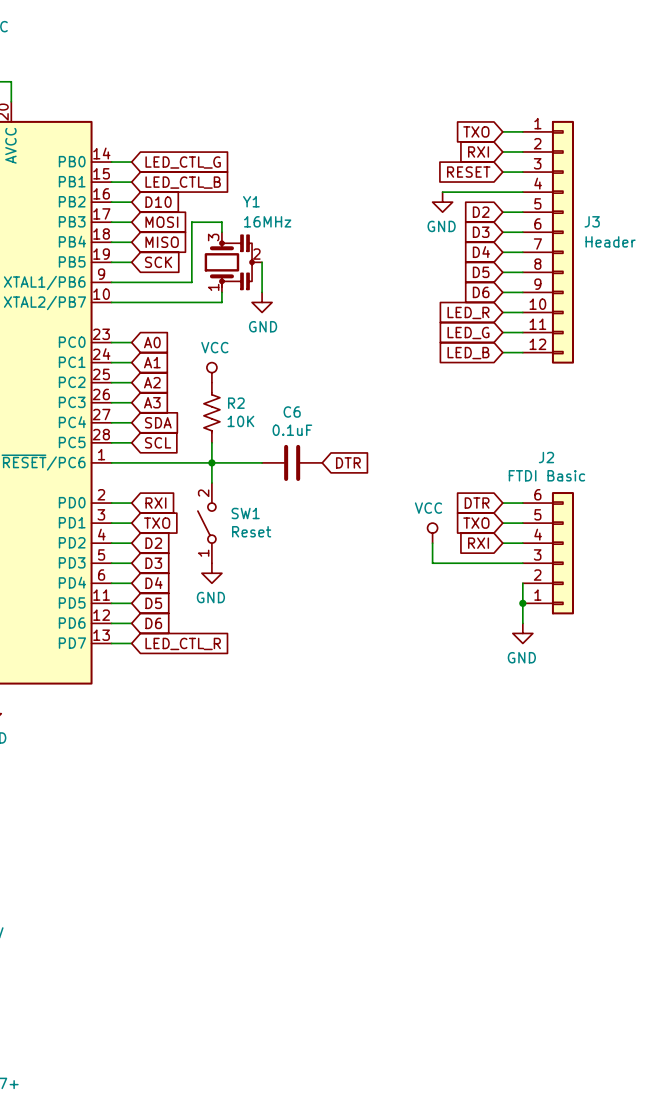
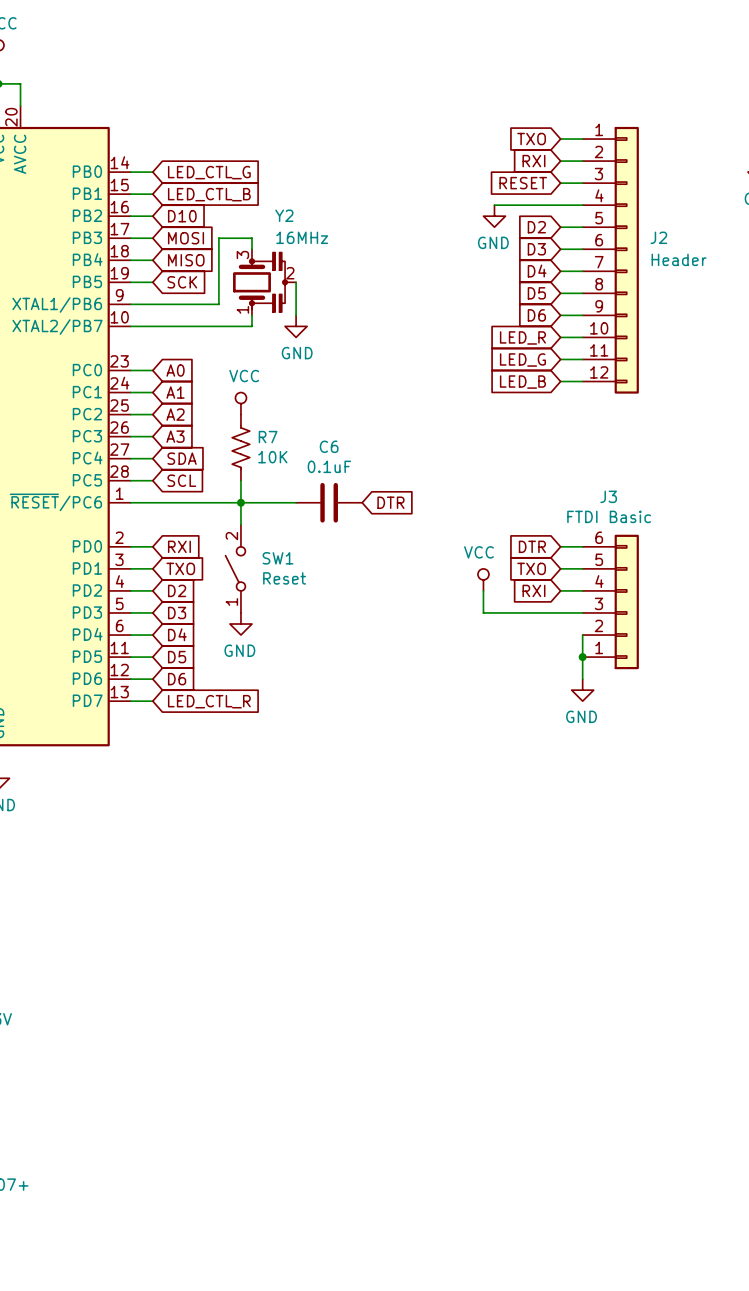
Y1 name: Y1 (251, 201) -> Y2 (284, 215)
J3 name: J3 (592, 221) -> J2 (658, 237)
R2 name: R2 (236, 403) -> R7 (268, 437)
J2 name: J2 (546, 457) -> J3 (608, 496)

